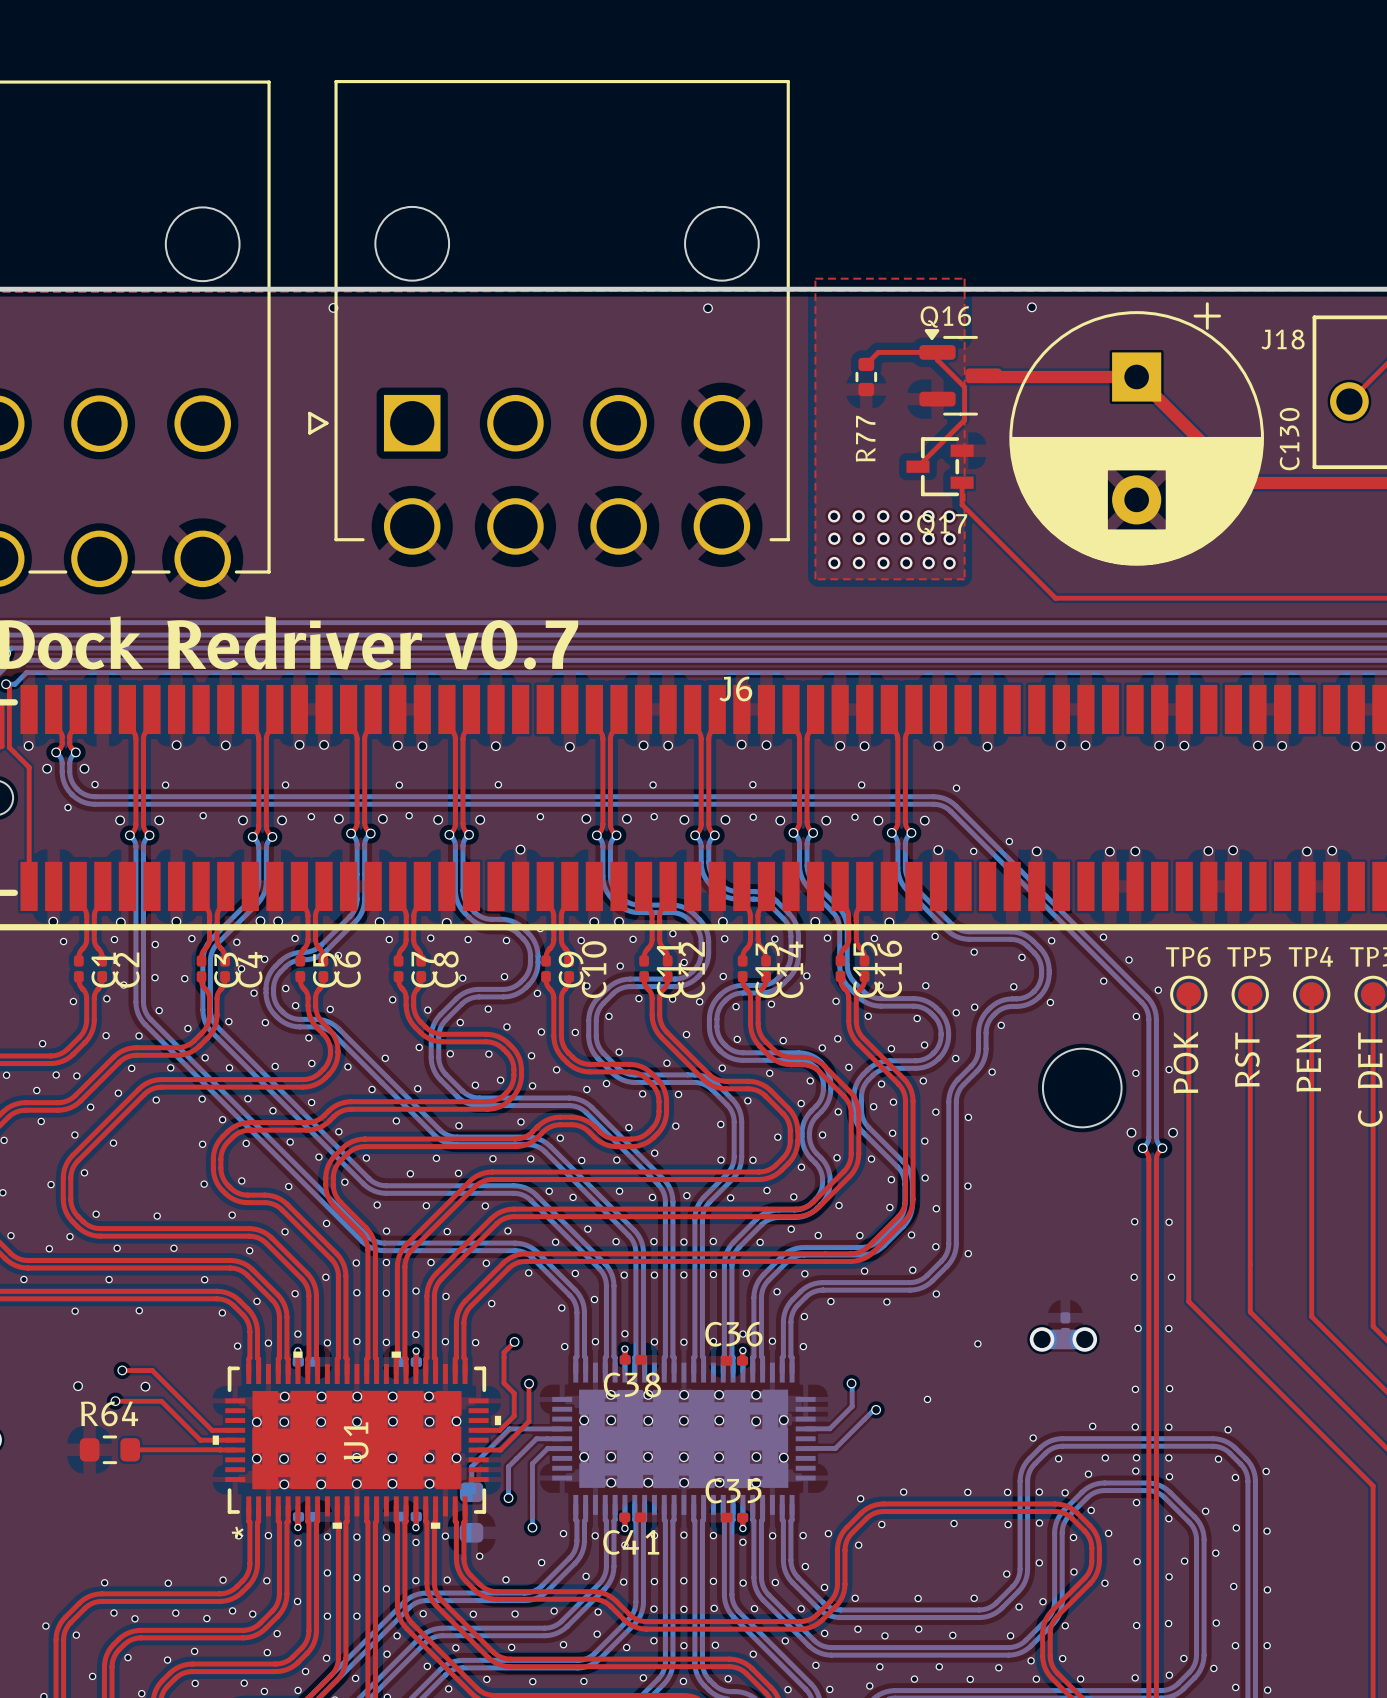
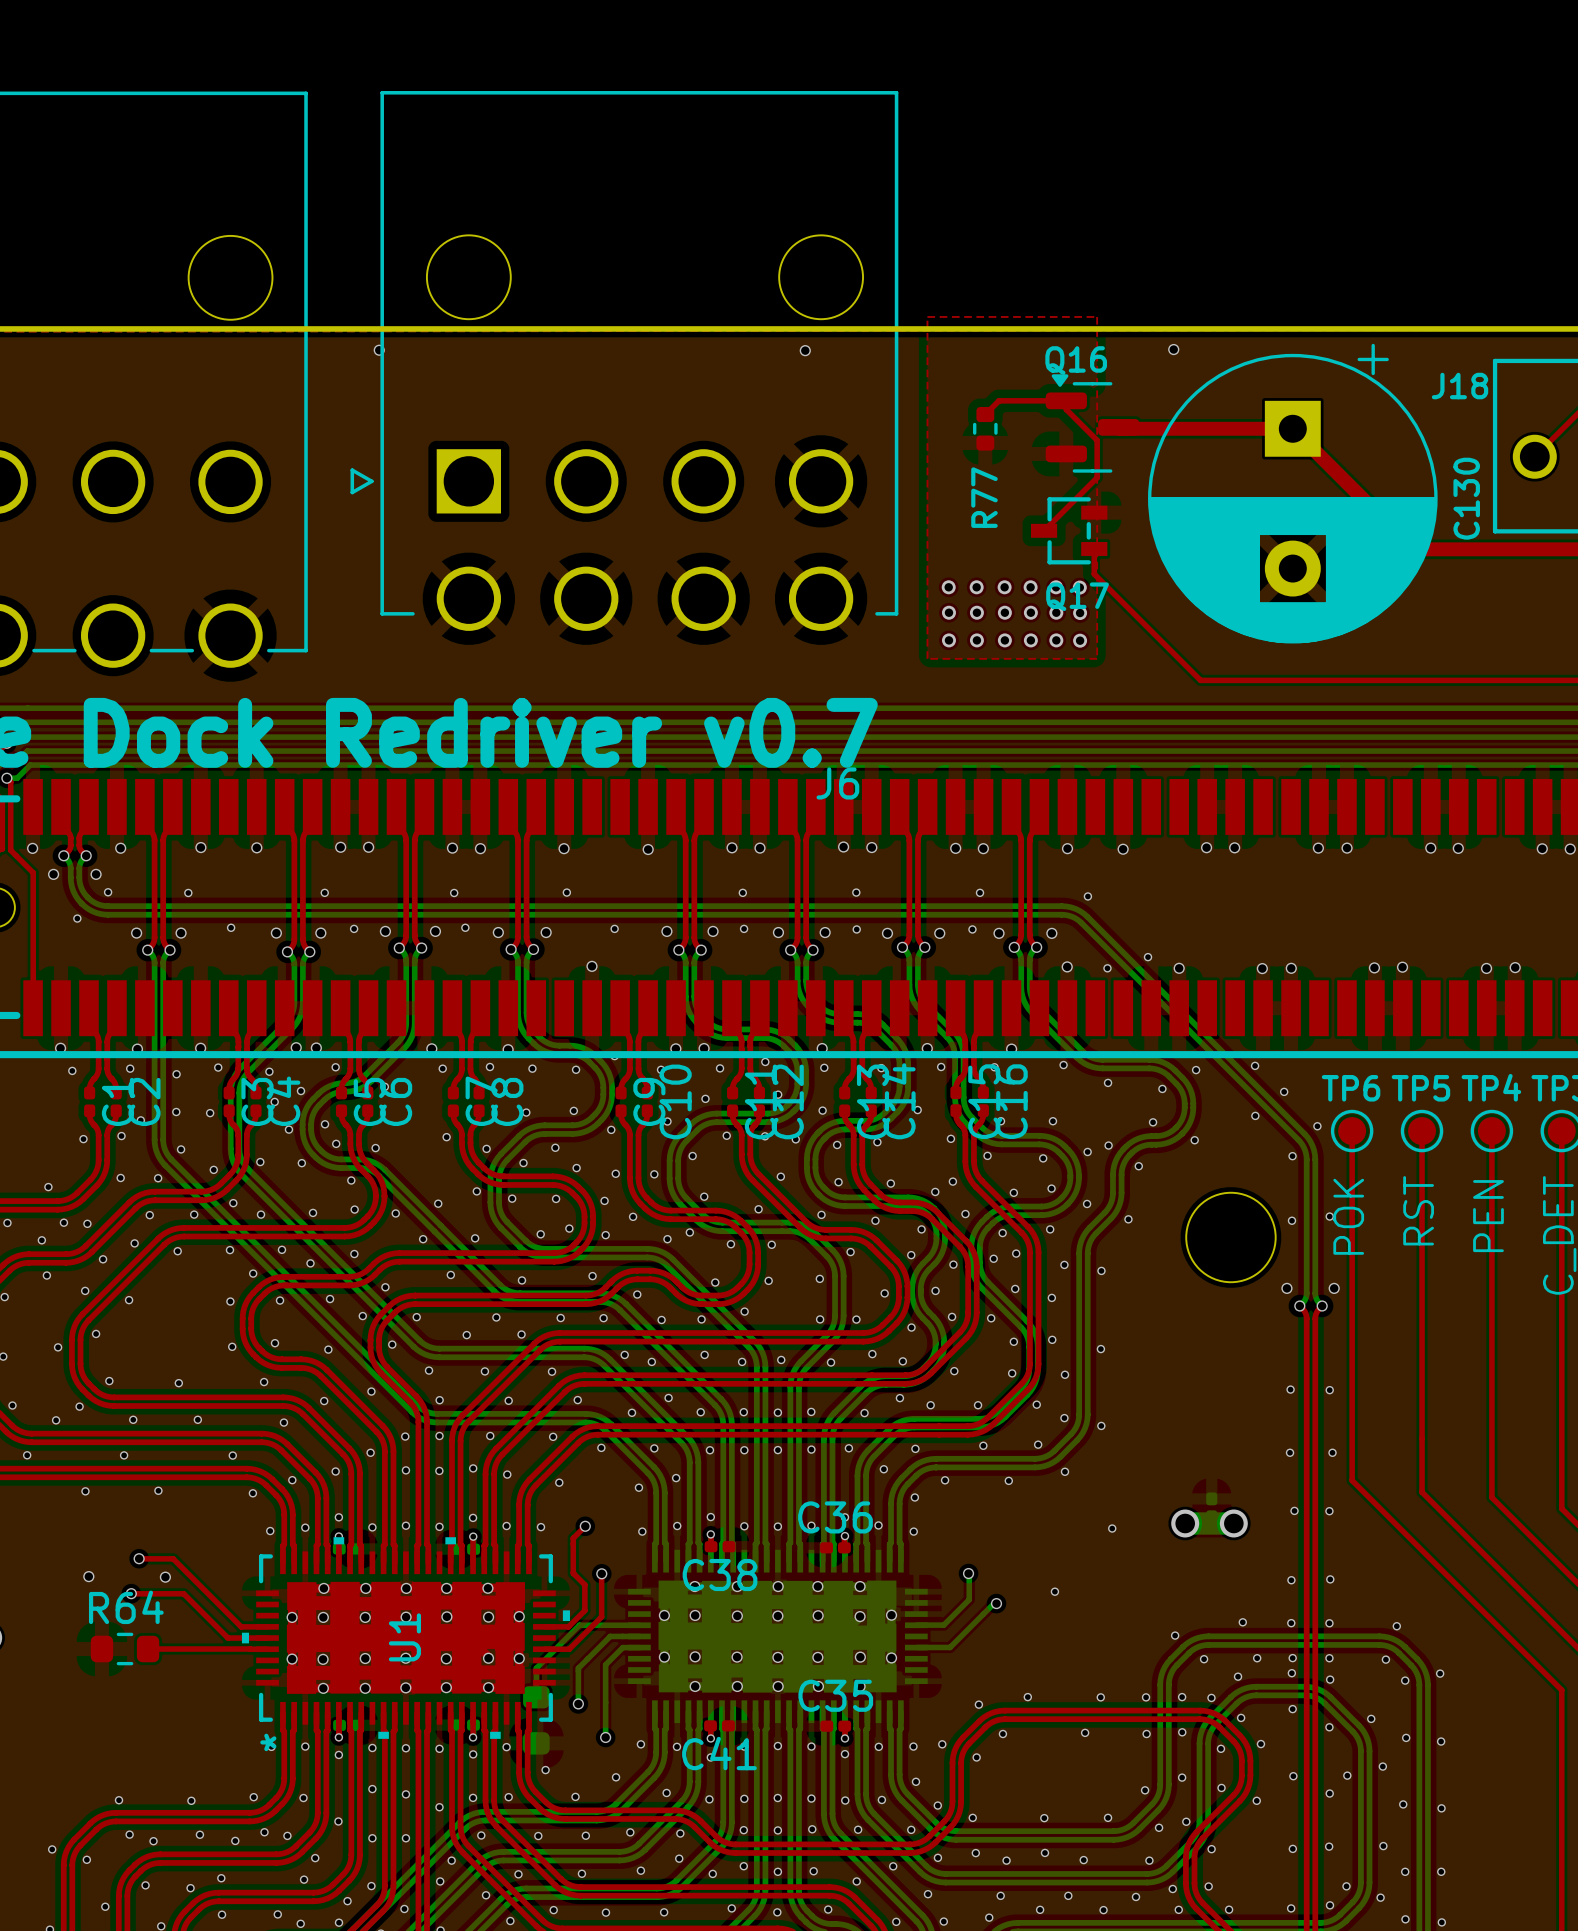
via: none -> (120, 848)

